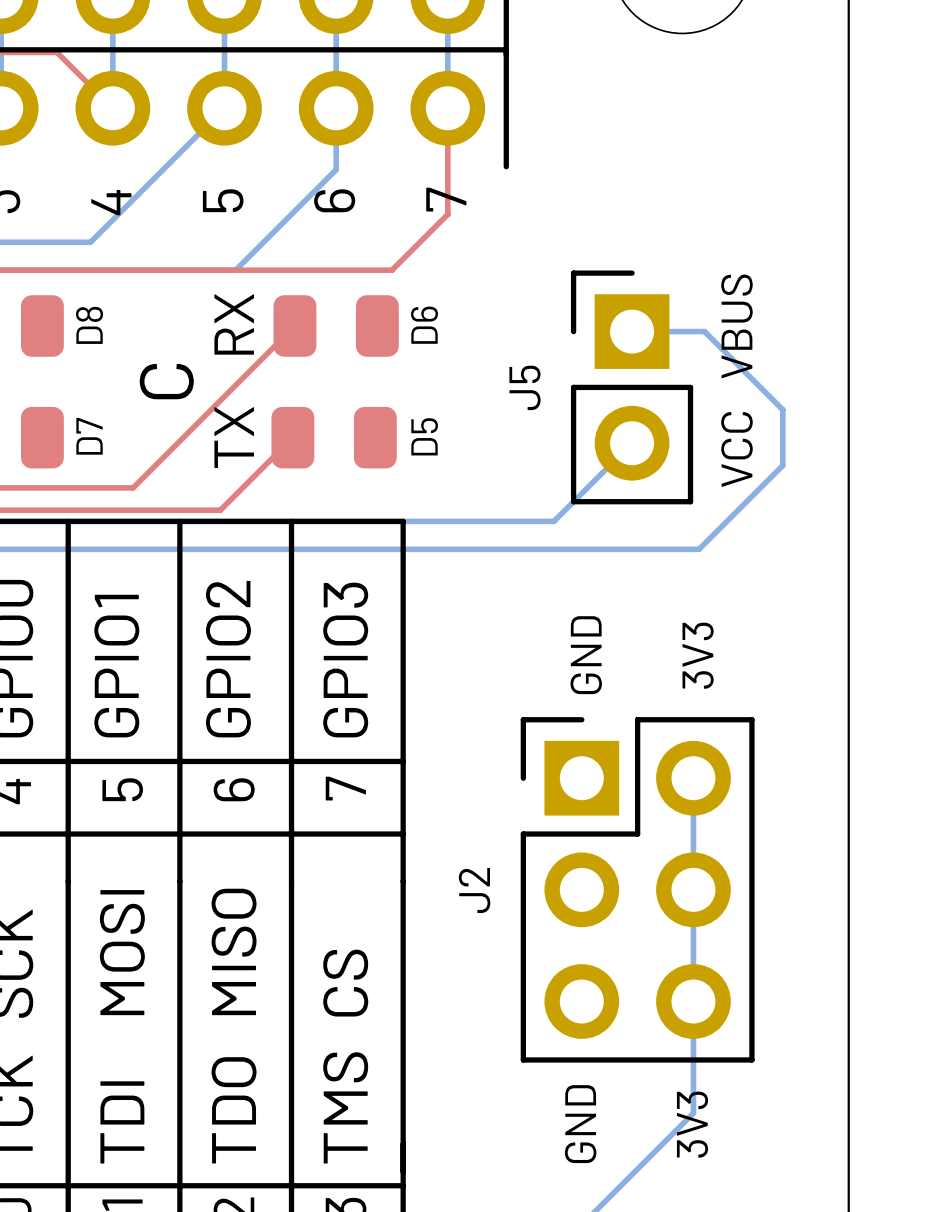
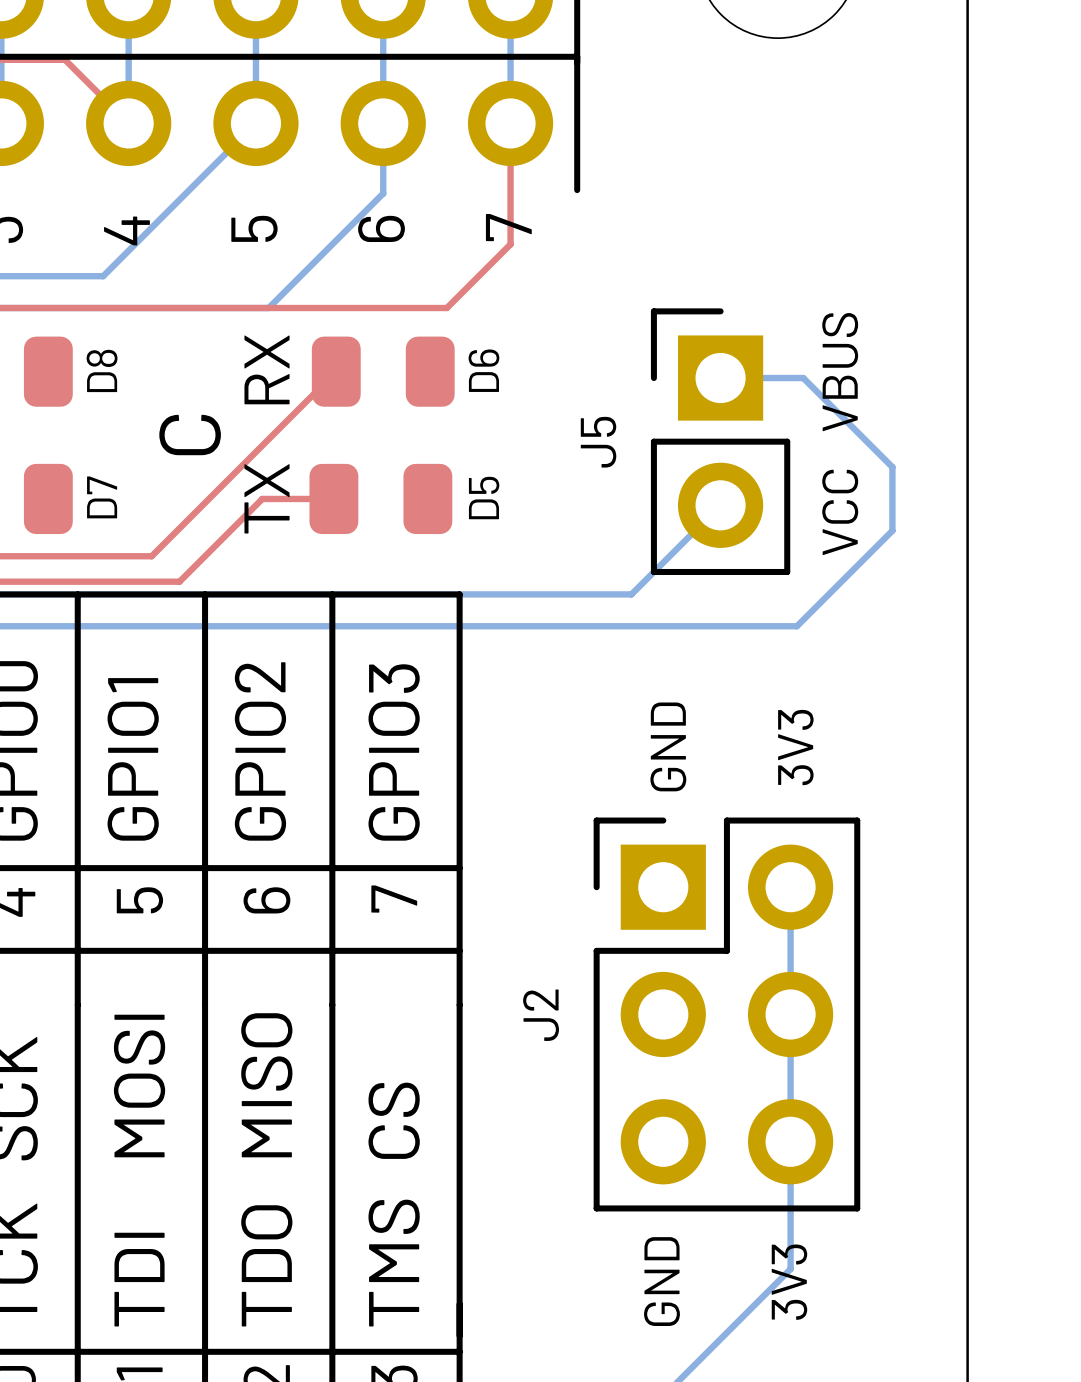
top track: (292, 437) (220, 510) (157, 510) -> (336, 498) (262, 498) (179, 581)

